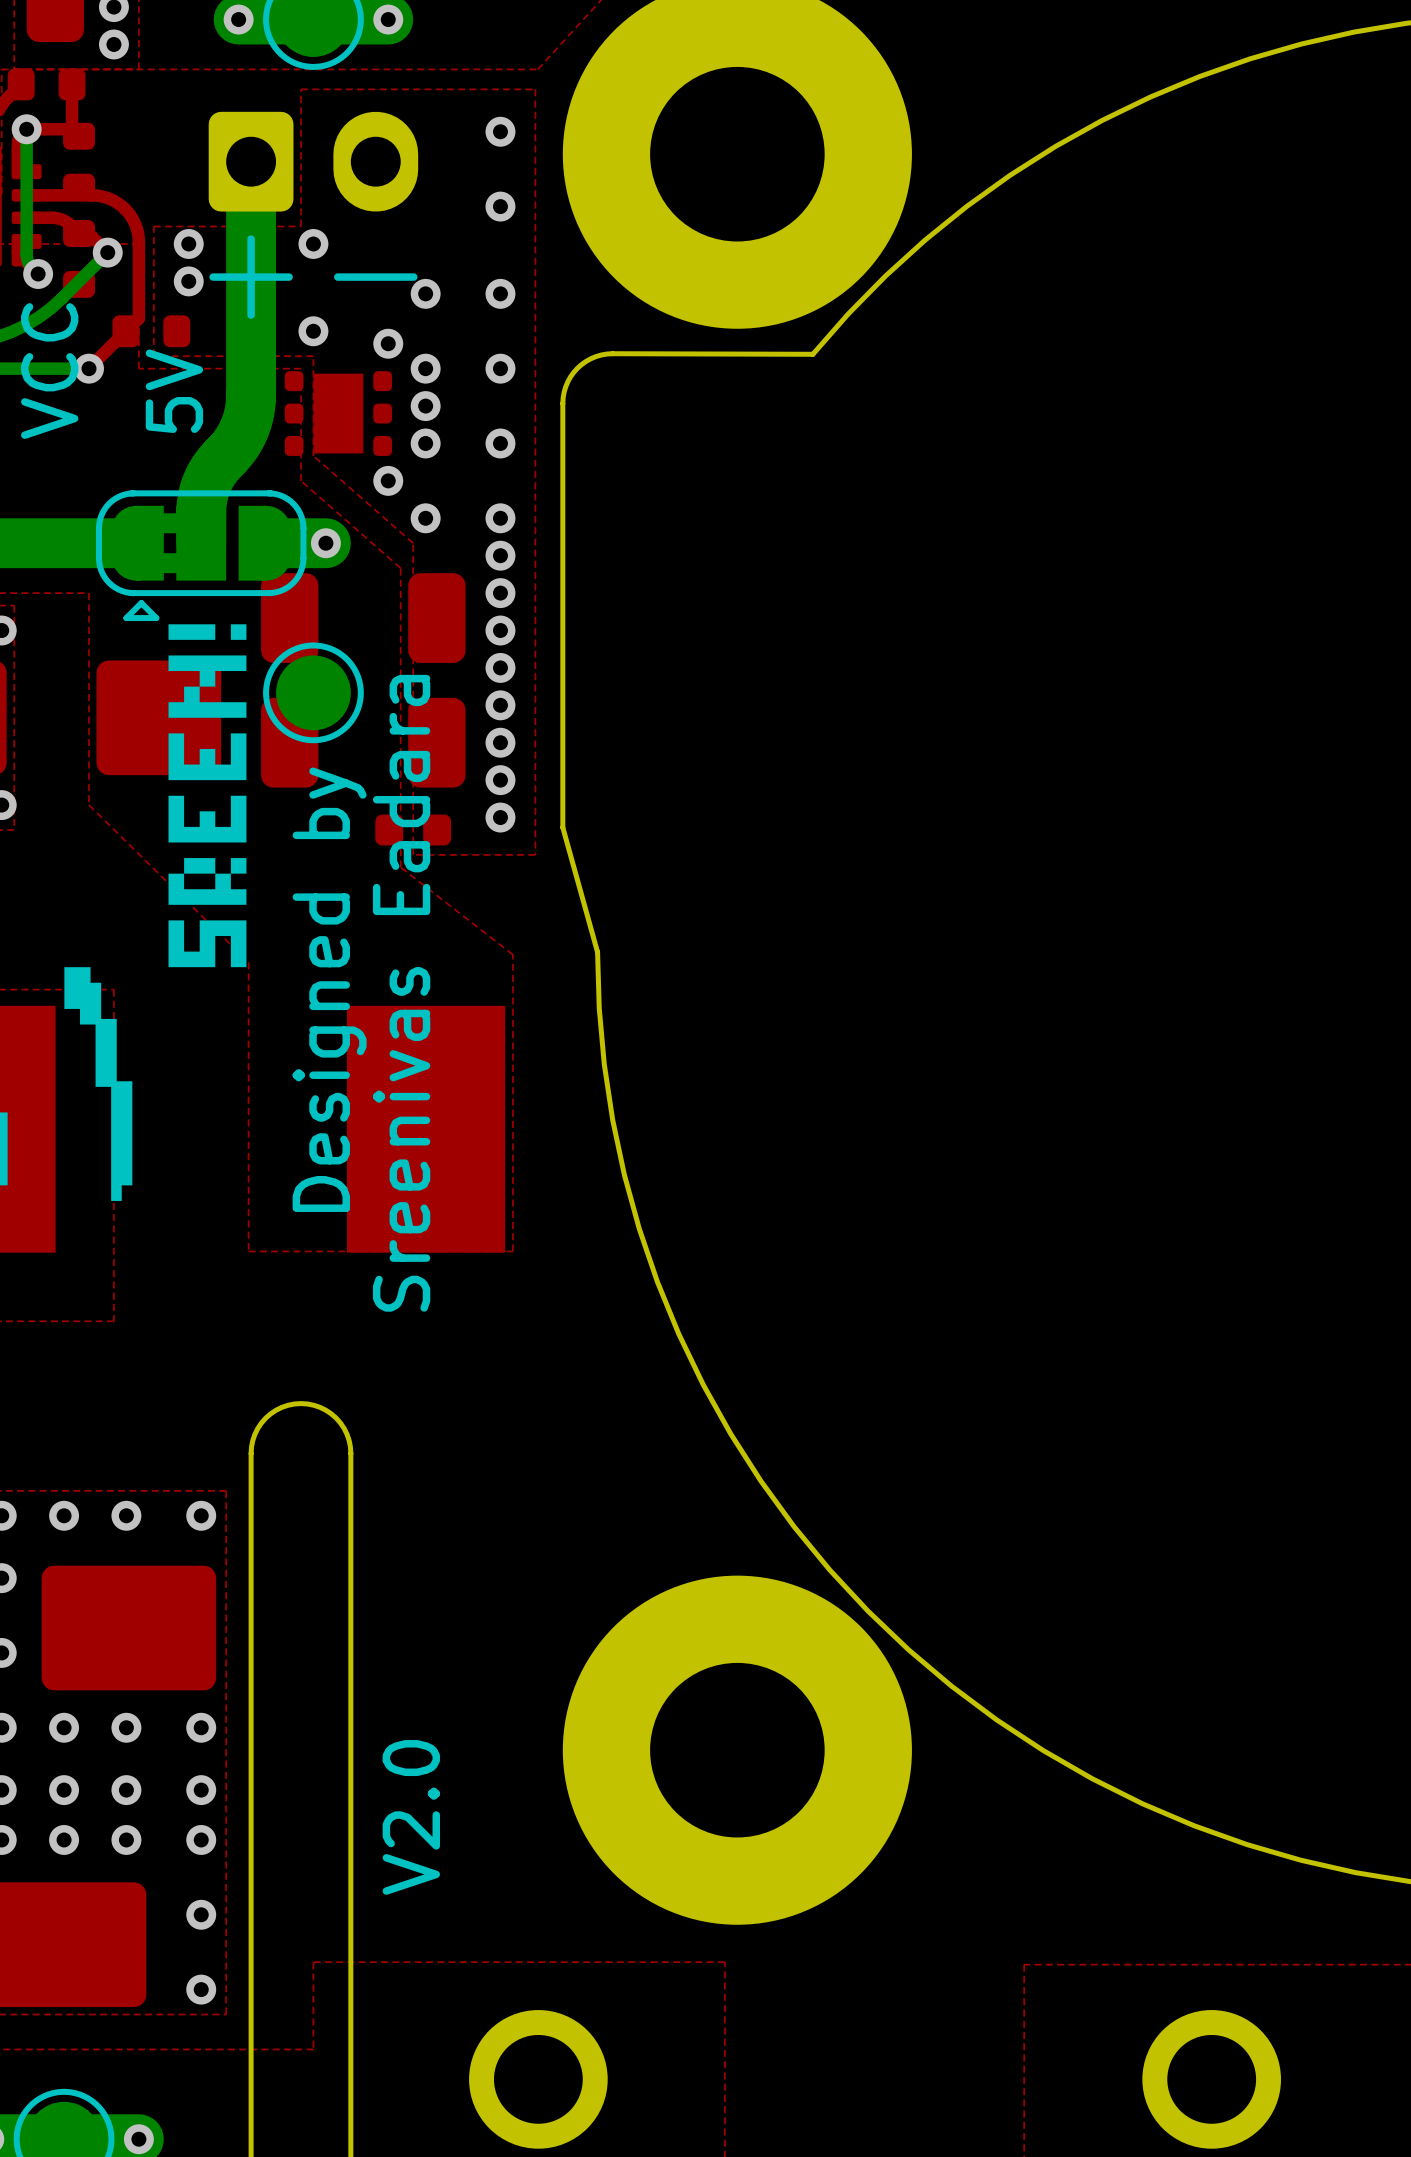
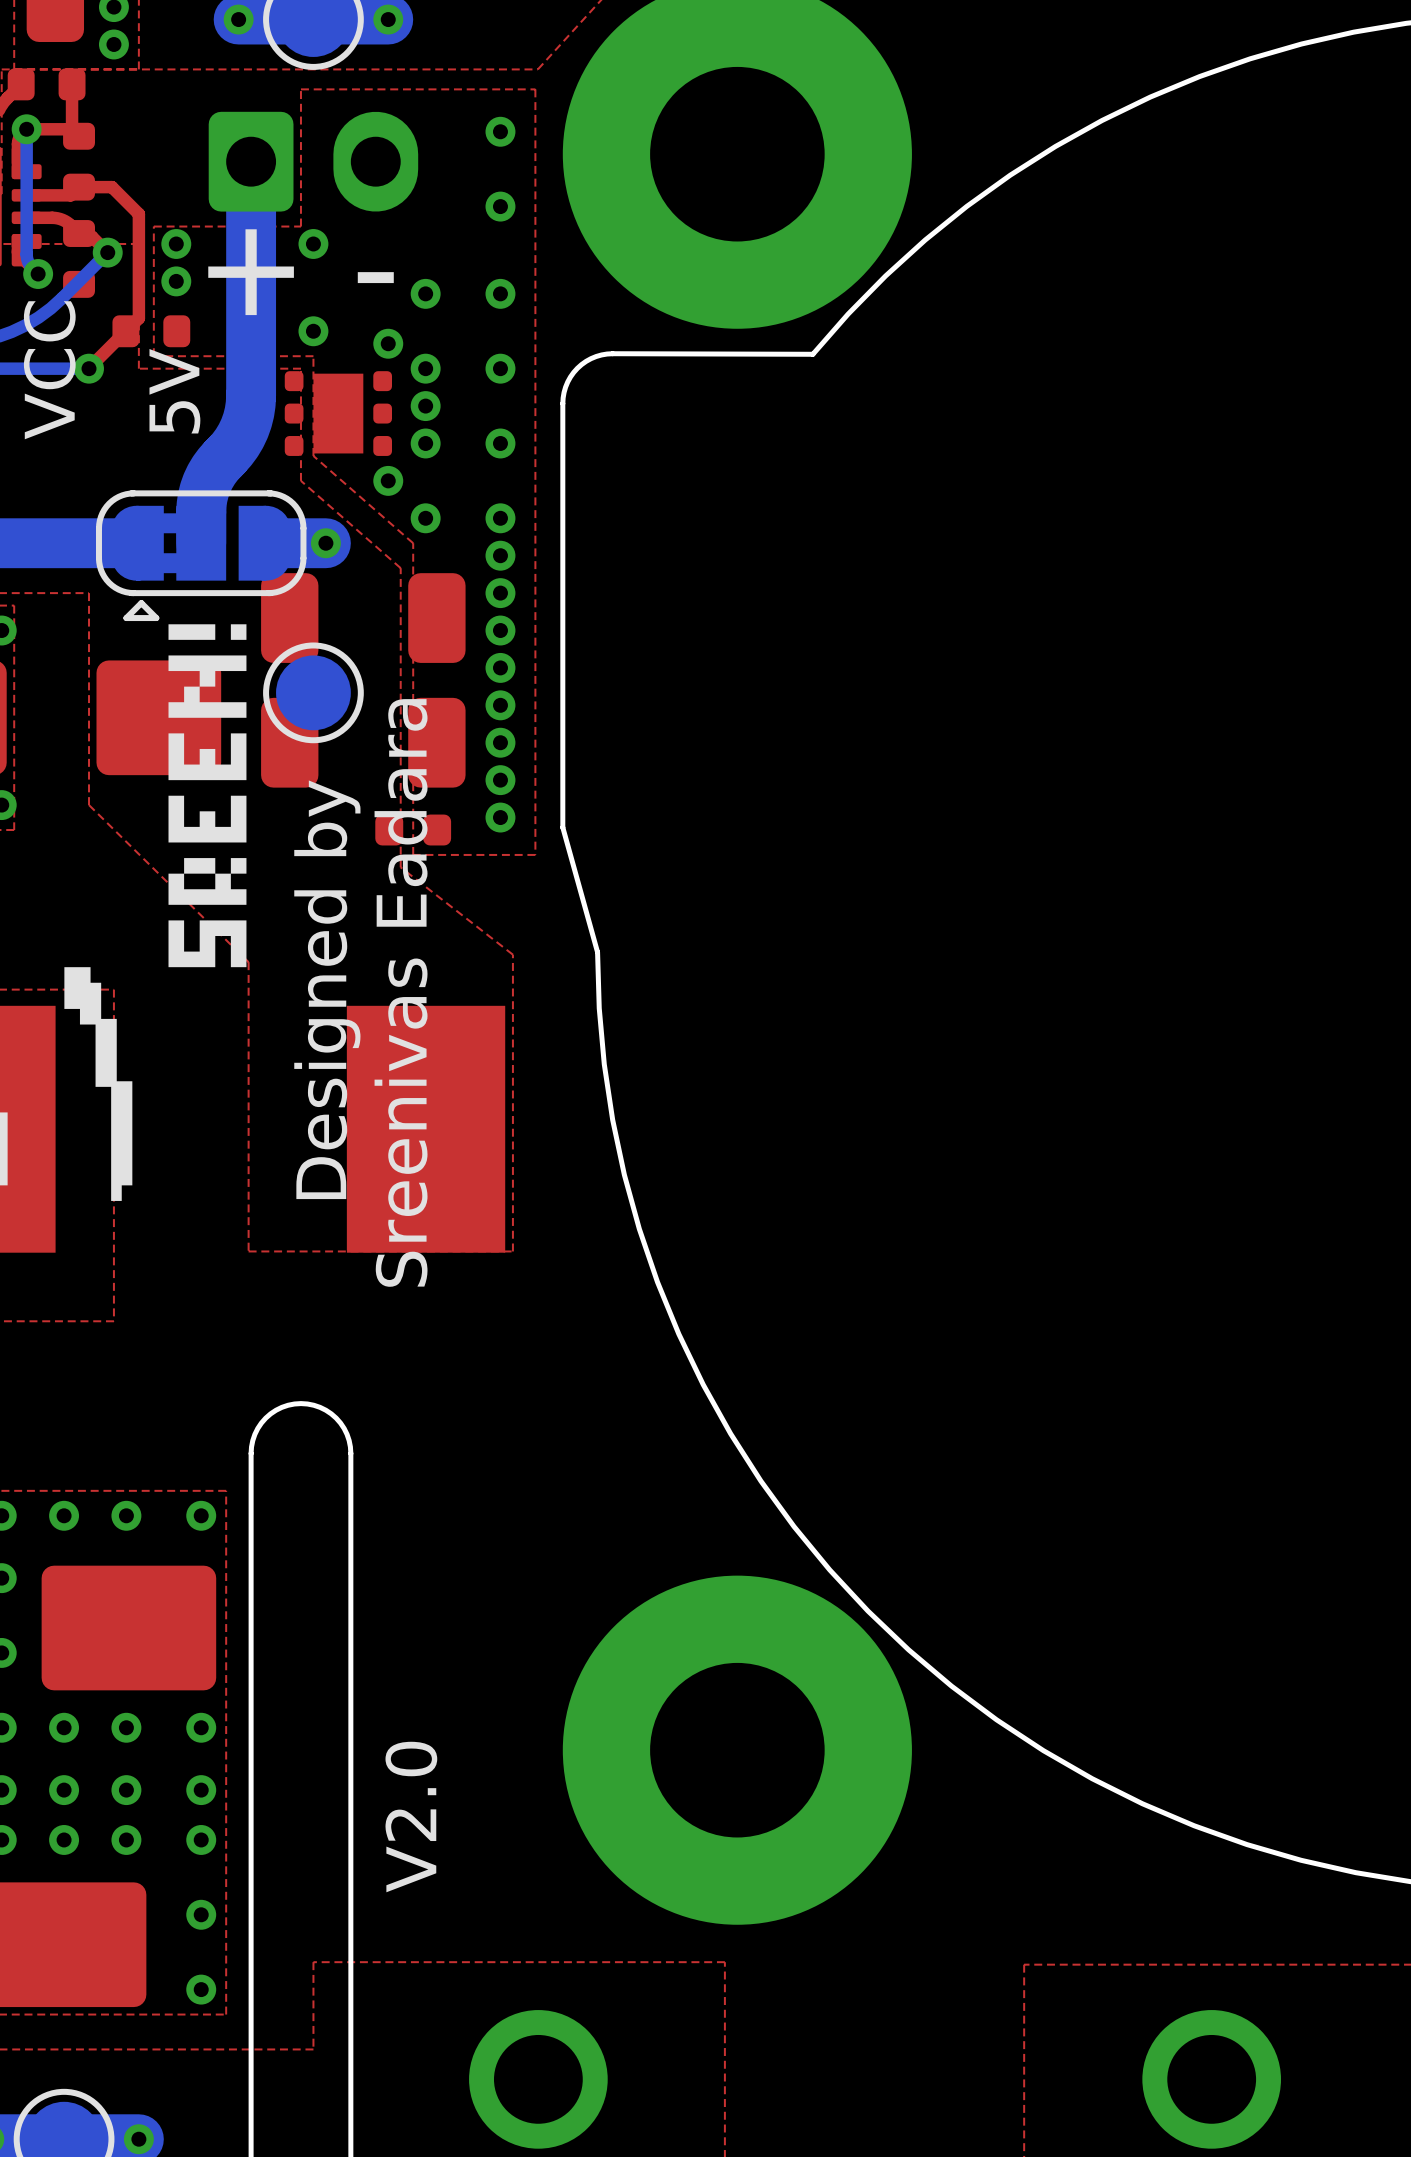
top track: (70, 195) (101, 196) (118, 203) (133, 220) (138, 242) -> (70, 195) (79, 187) (111, 187) (138, 214) (138, 242)
via position: (188, 243) -> (176, 243)
via position: (188, 281) -> (176, 281)

